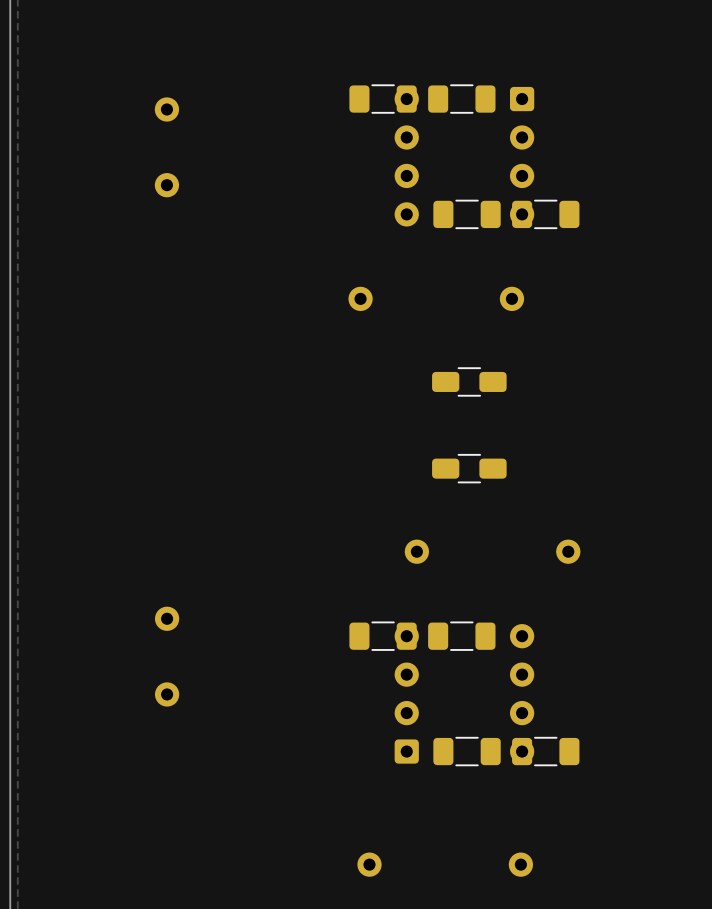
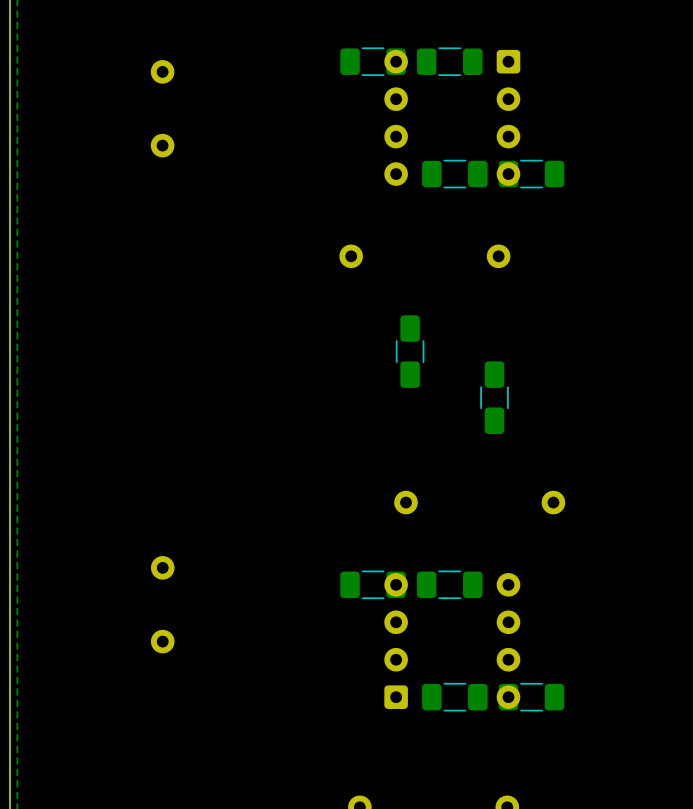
part: (469, 381) -> none
part: none -> (410, 351)
part: none -> (494, 397)
part: (469, 468) -> none

